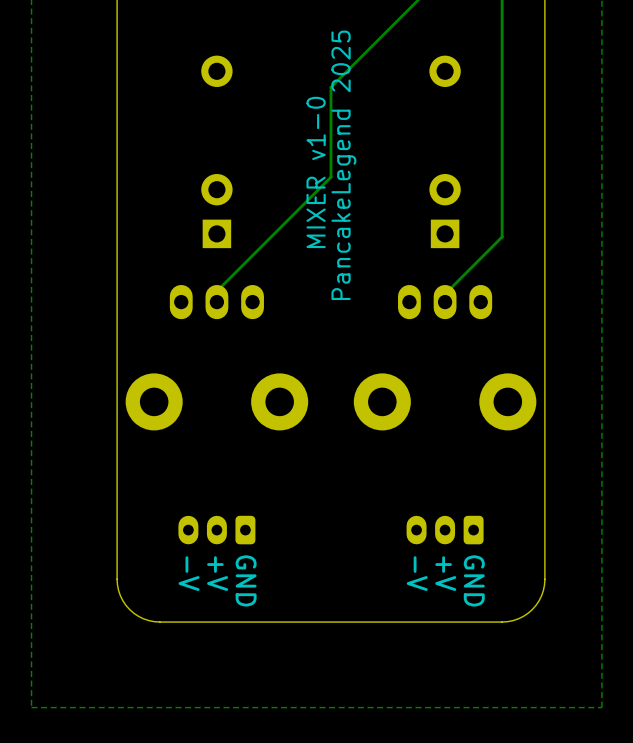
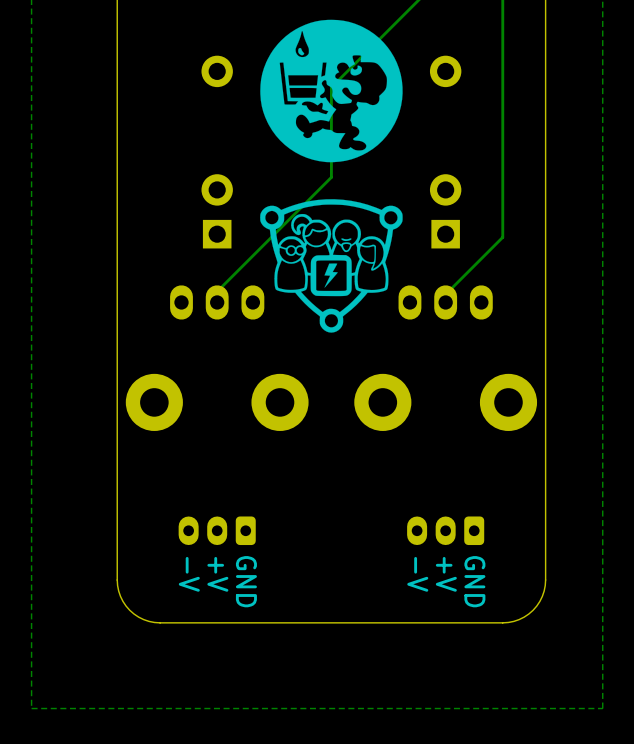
drawing: none -> [260, 19, 403, 163]
text: PancakeLegend 2025 (343, 165) -> none
text: MIXER v1-0 (316, 172) -> none
drawing: none -> [260, 199, 403, 333]

